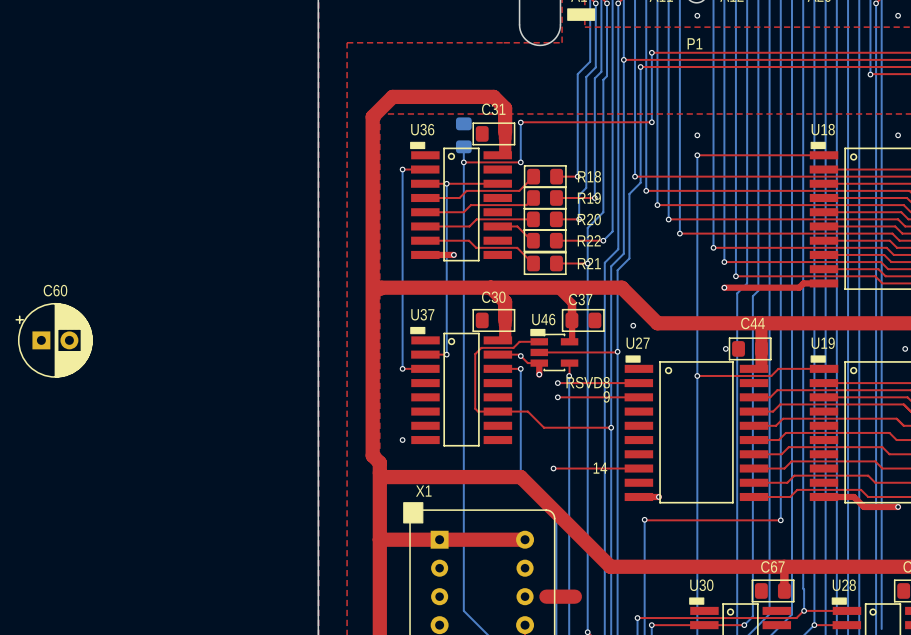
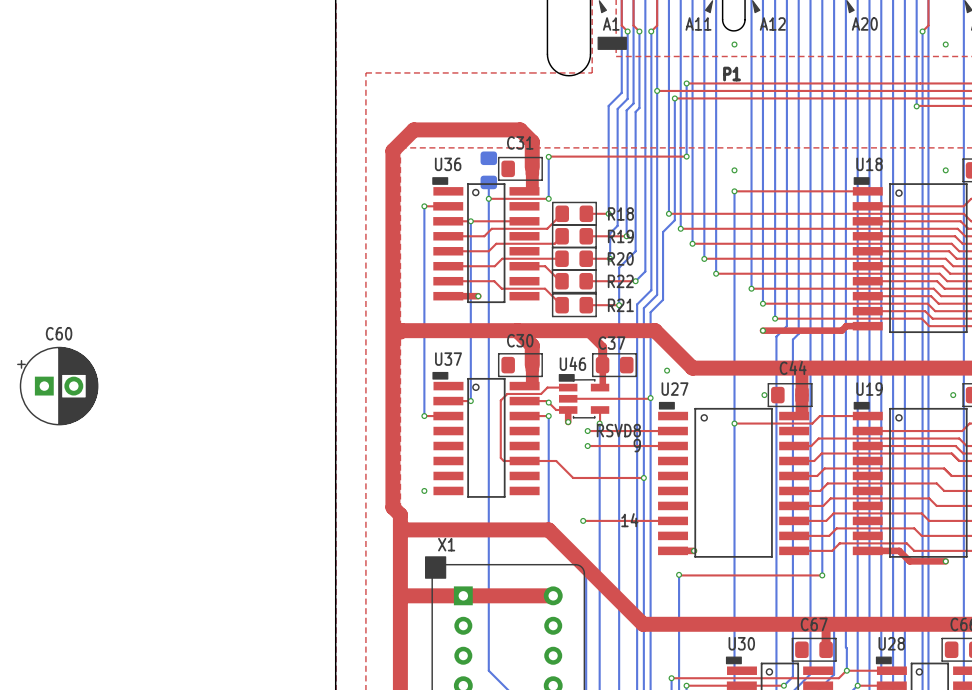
top track: (546, 596) (574, 596) -> none

